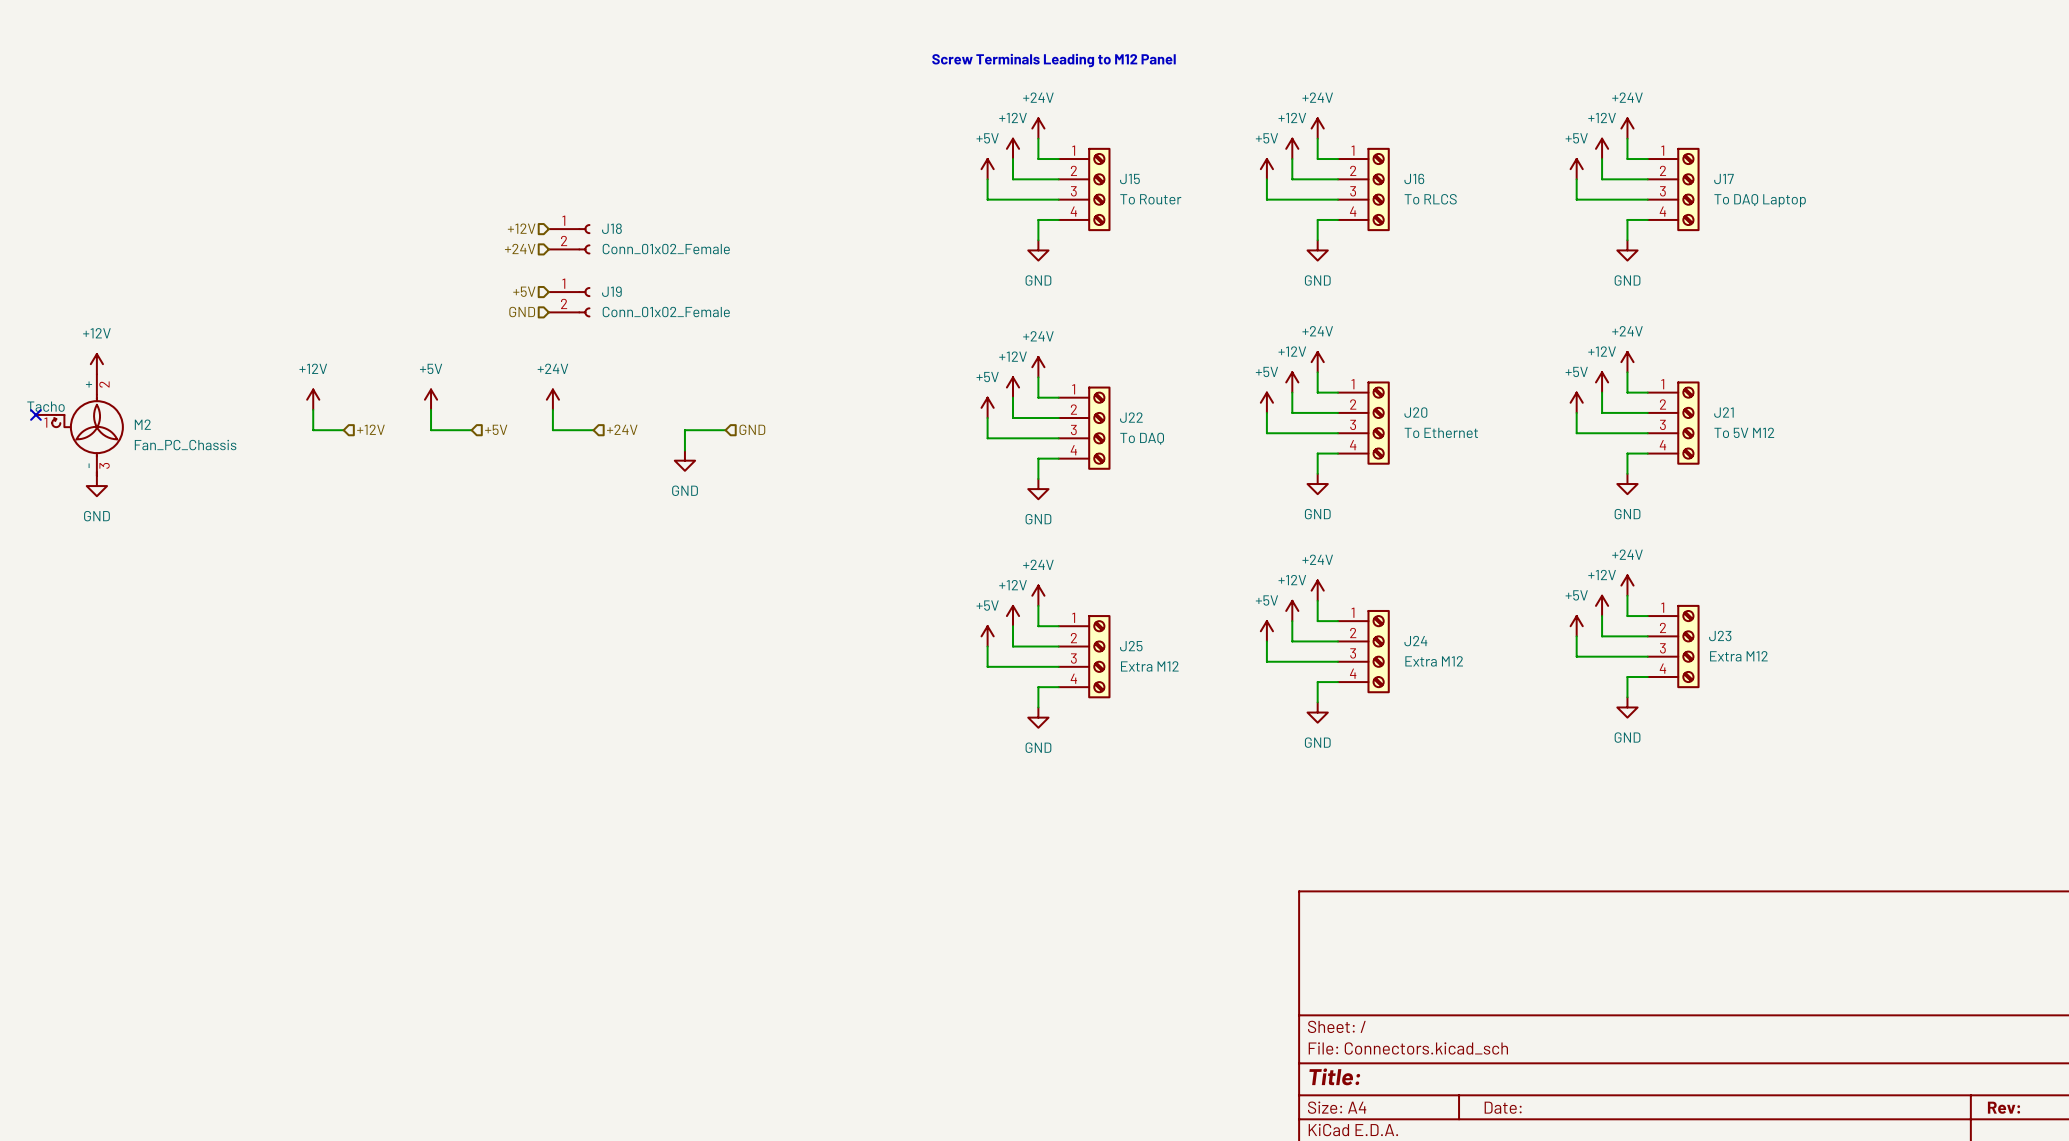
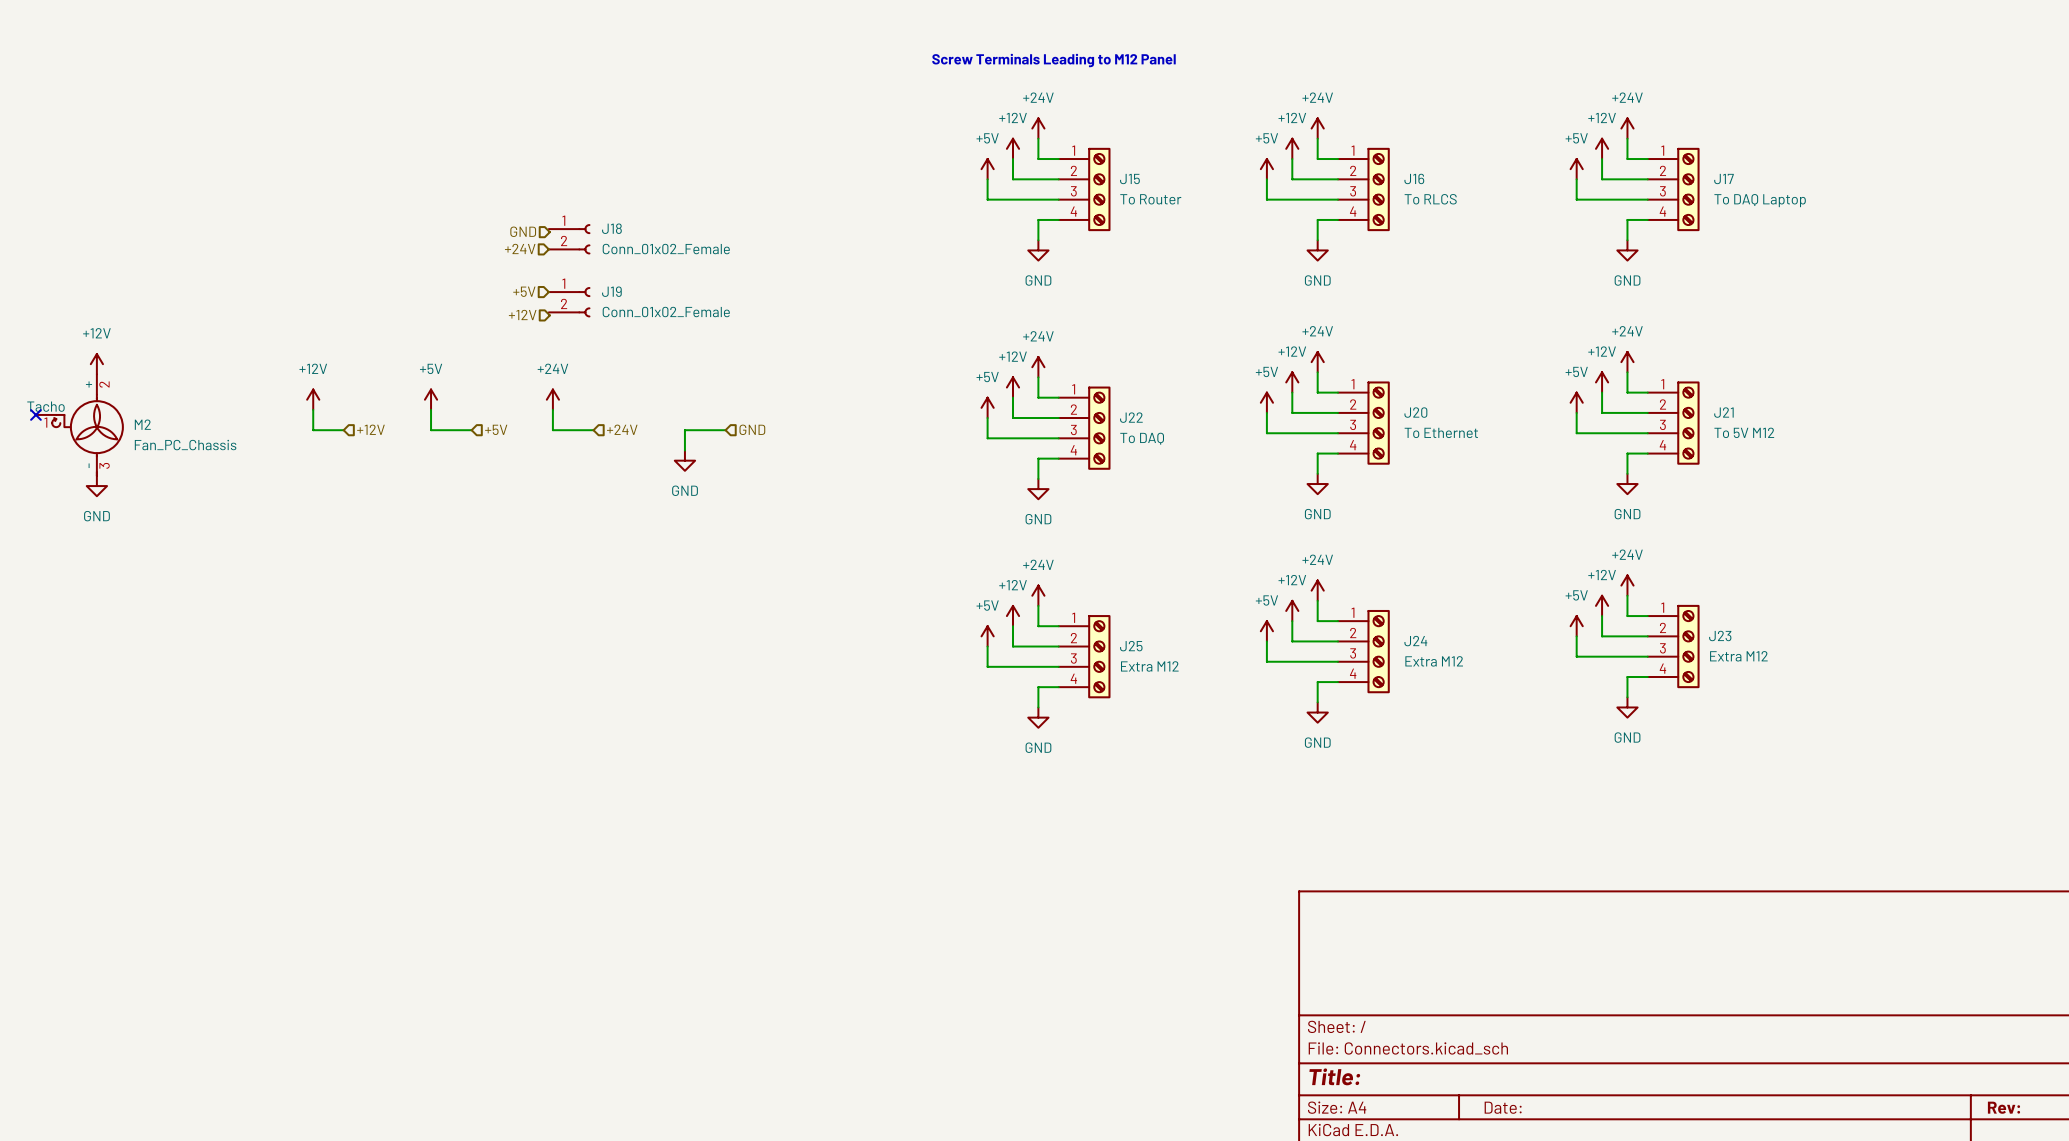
hierarchical label: +12V (521, 228) -> GND (523, 231)
hierarchical label: GND (522, 312) -> +12V (522, 314)

